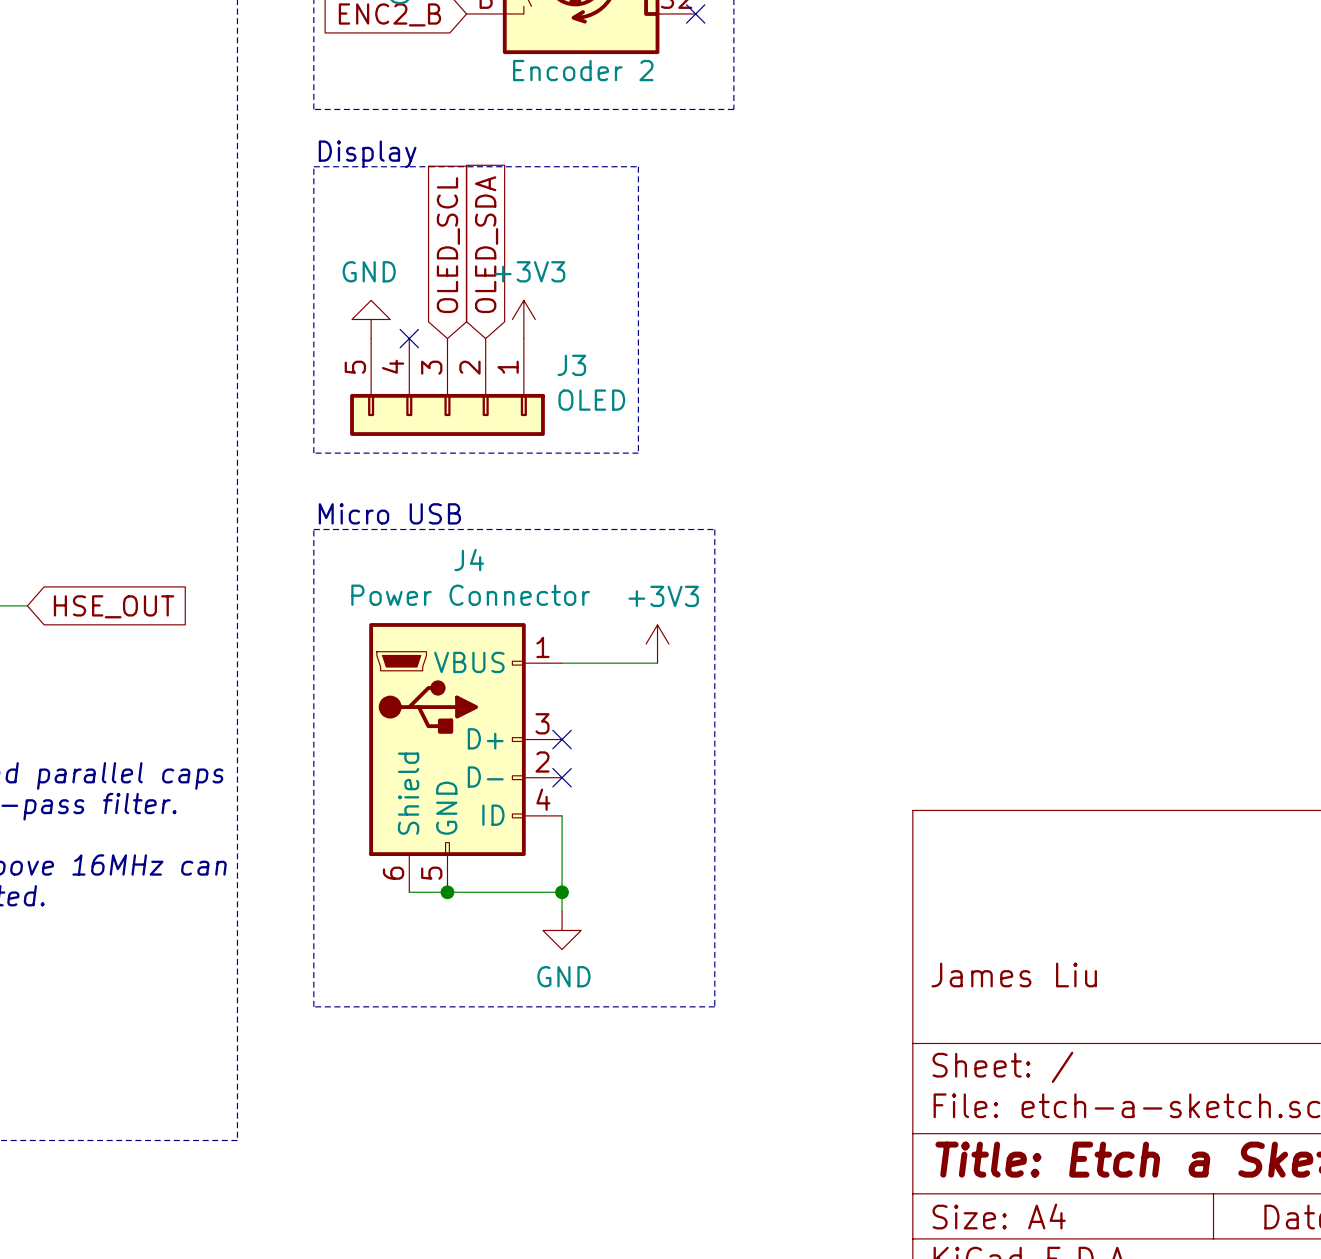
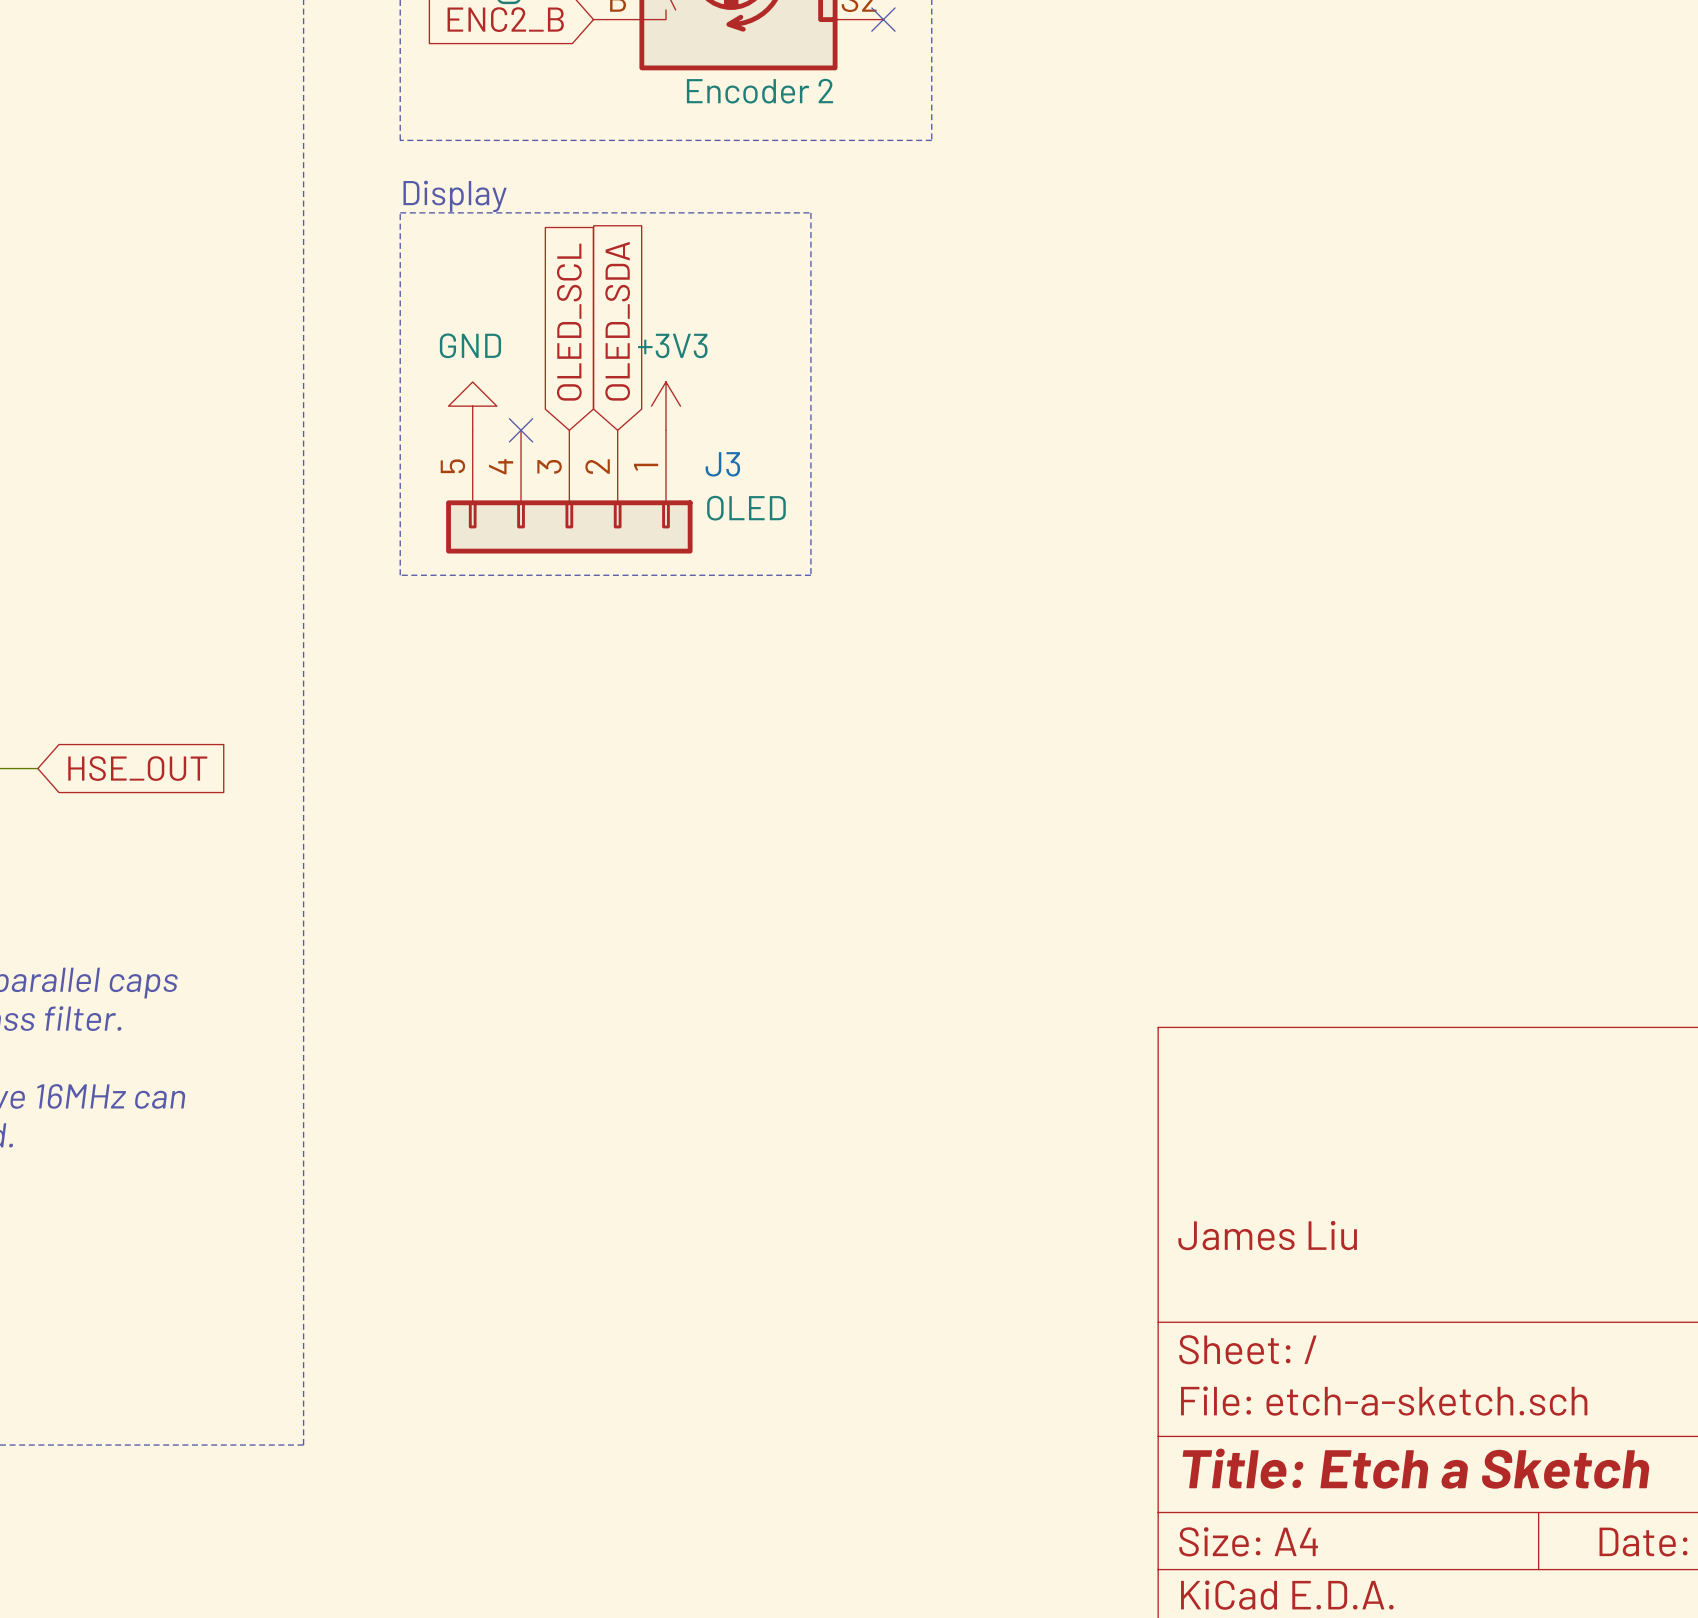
text: Micro USB (389, 513) -> none
line: (313, 529) (714, 529) (714, 1006) (313, 1006) (313, 529) -> none
power symbol: +3V3 (657, 644) -> none
wire: (562, 663) (657, 663) -> none
no-connect mark: (562, 739) -> none
J4: Power Connector (465, 757) -> none
no-connect mark: (562, 777) -> none
wire: (562, 815) (562, 911) -> none
wire: (409, 892) (562, 892) -> none
junction: (447, 892) -> none
junction: (562, 892) -> none
power symbol: GND (562, 930) -> none

